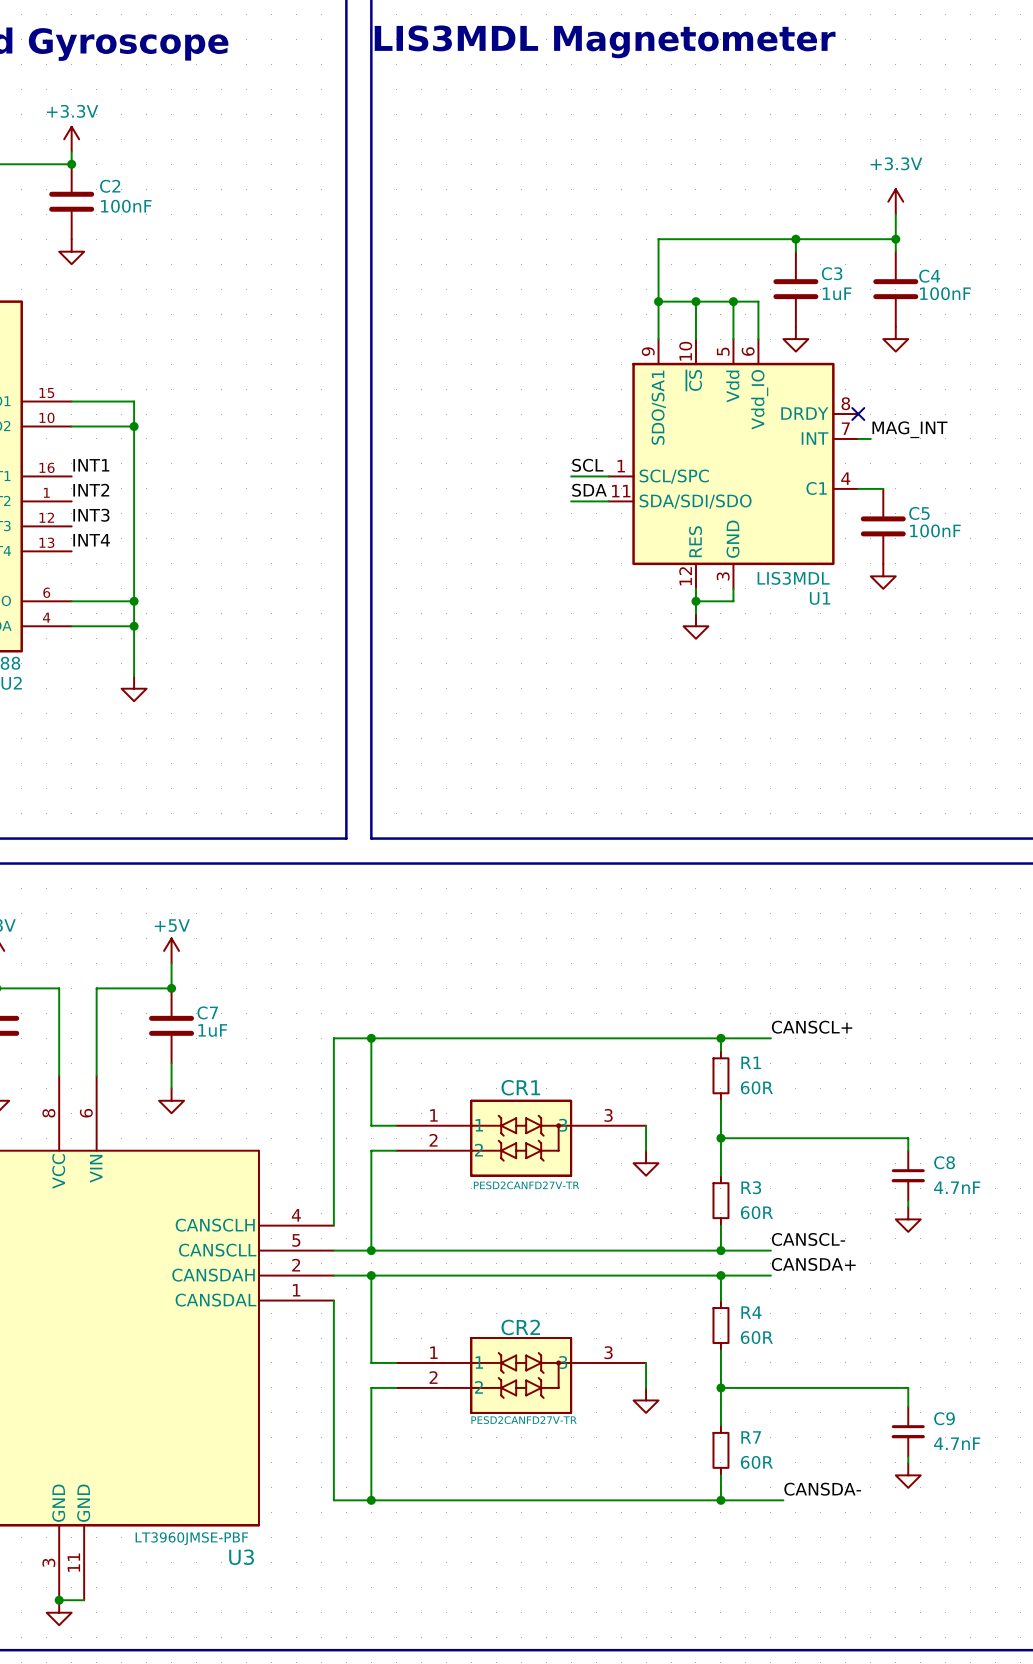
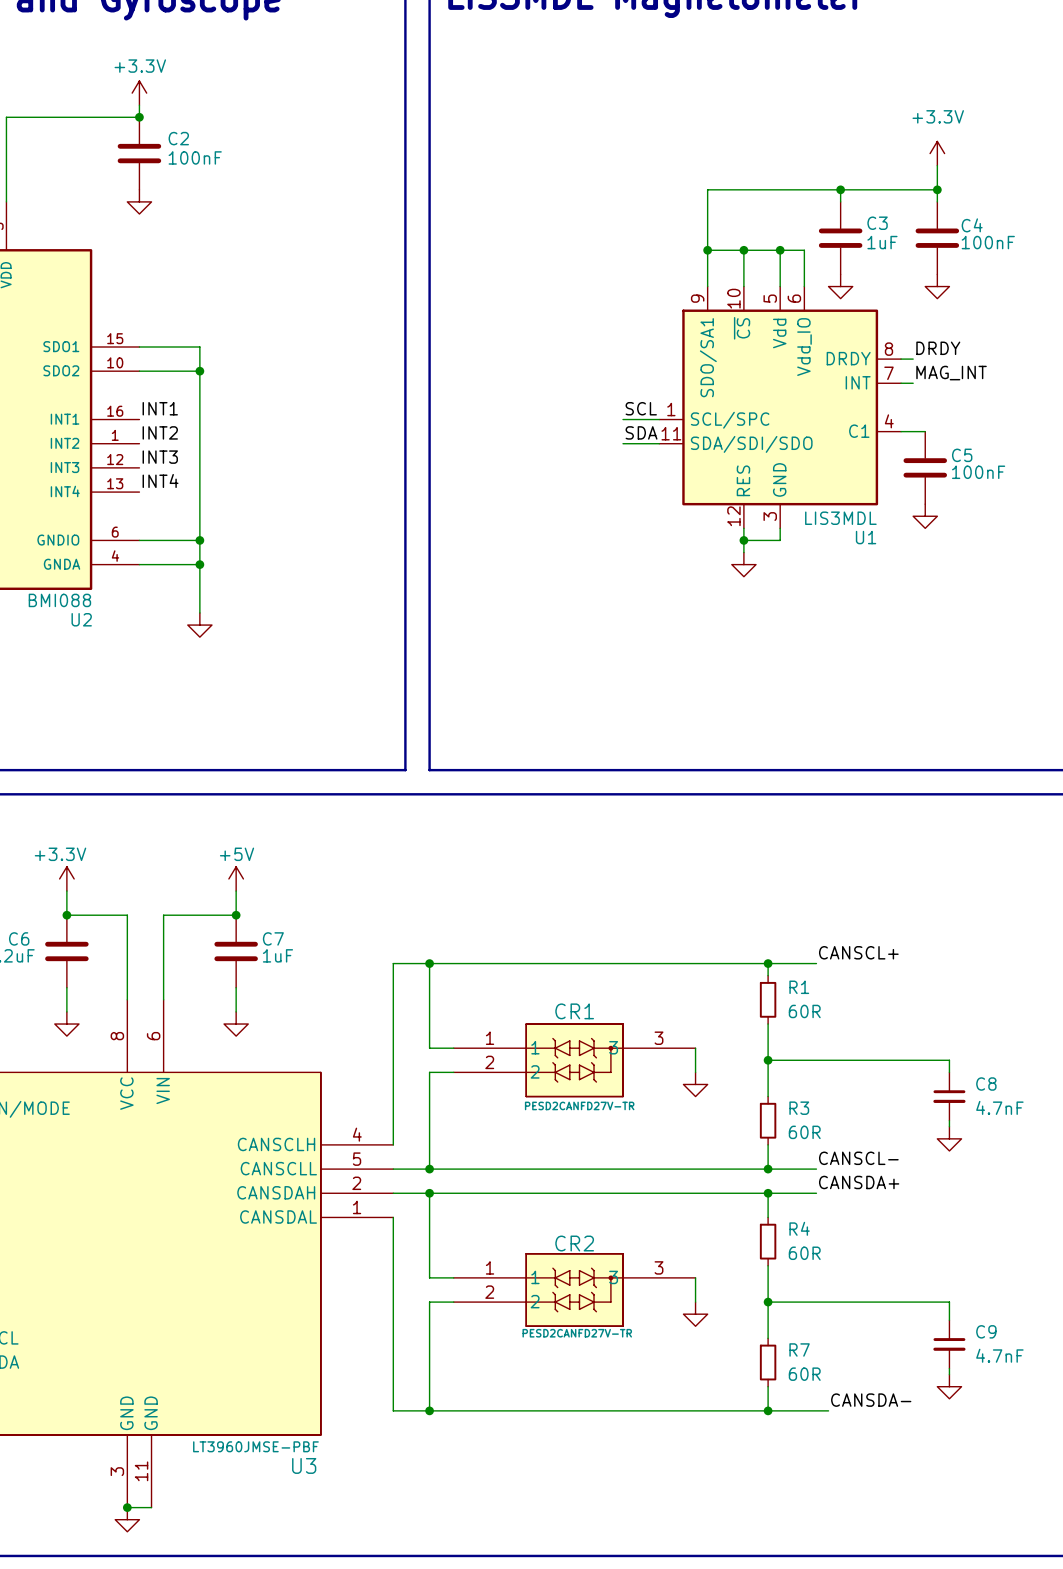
label: none -> DRDY (938, 348)
wire: none -> (901, 359) (913, 359)
no-connect mark: (858, 414) -> none

